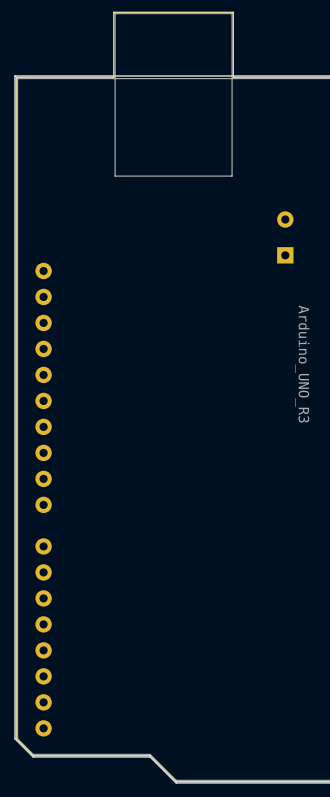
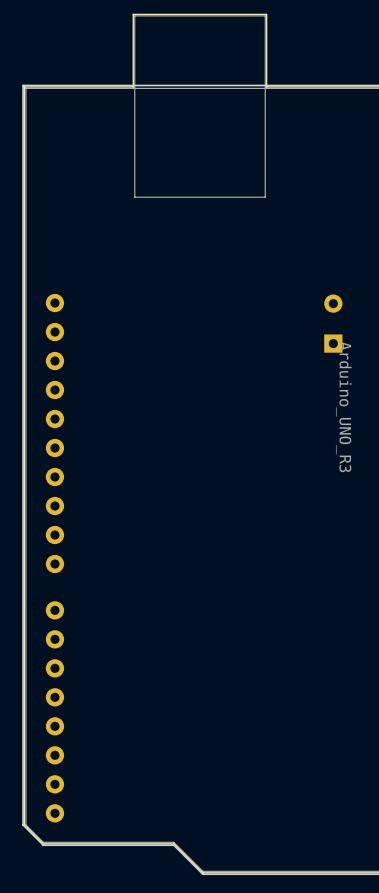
part position: (285, 237) -> (333, 323)

